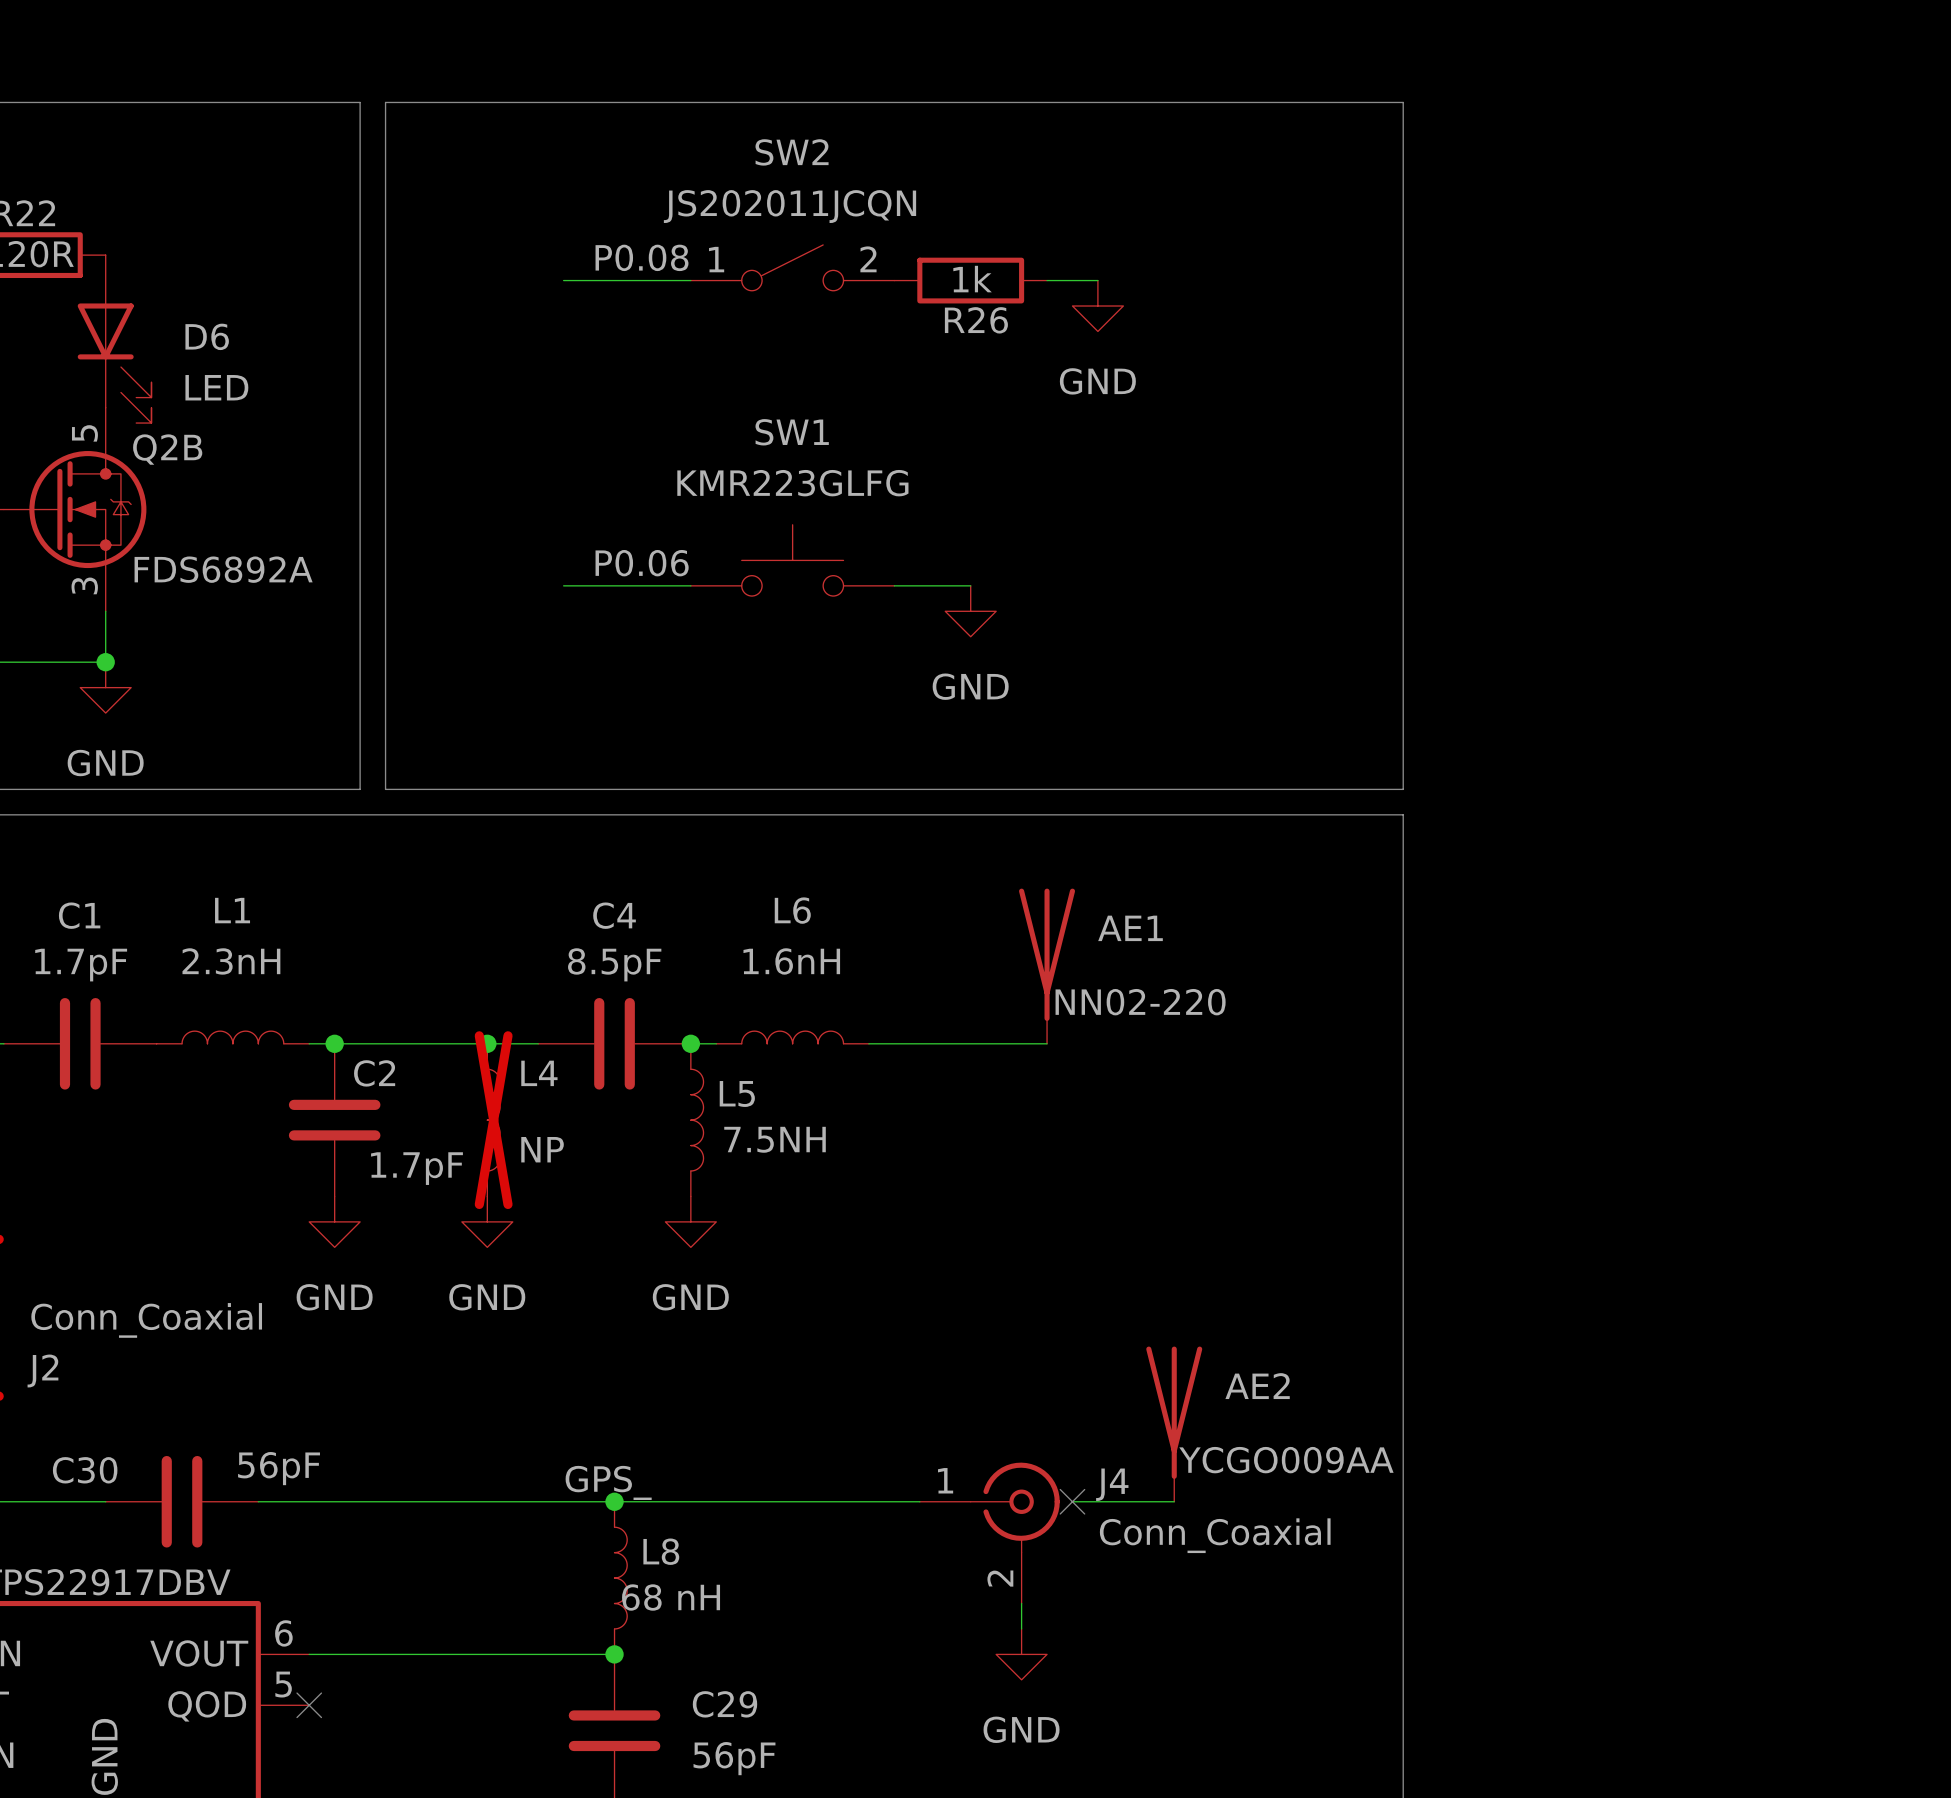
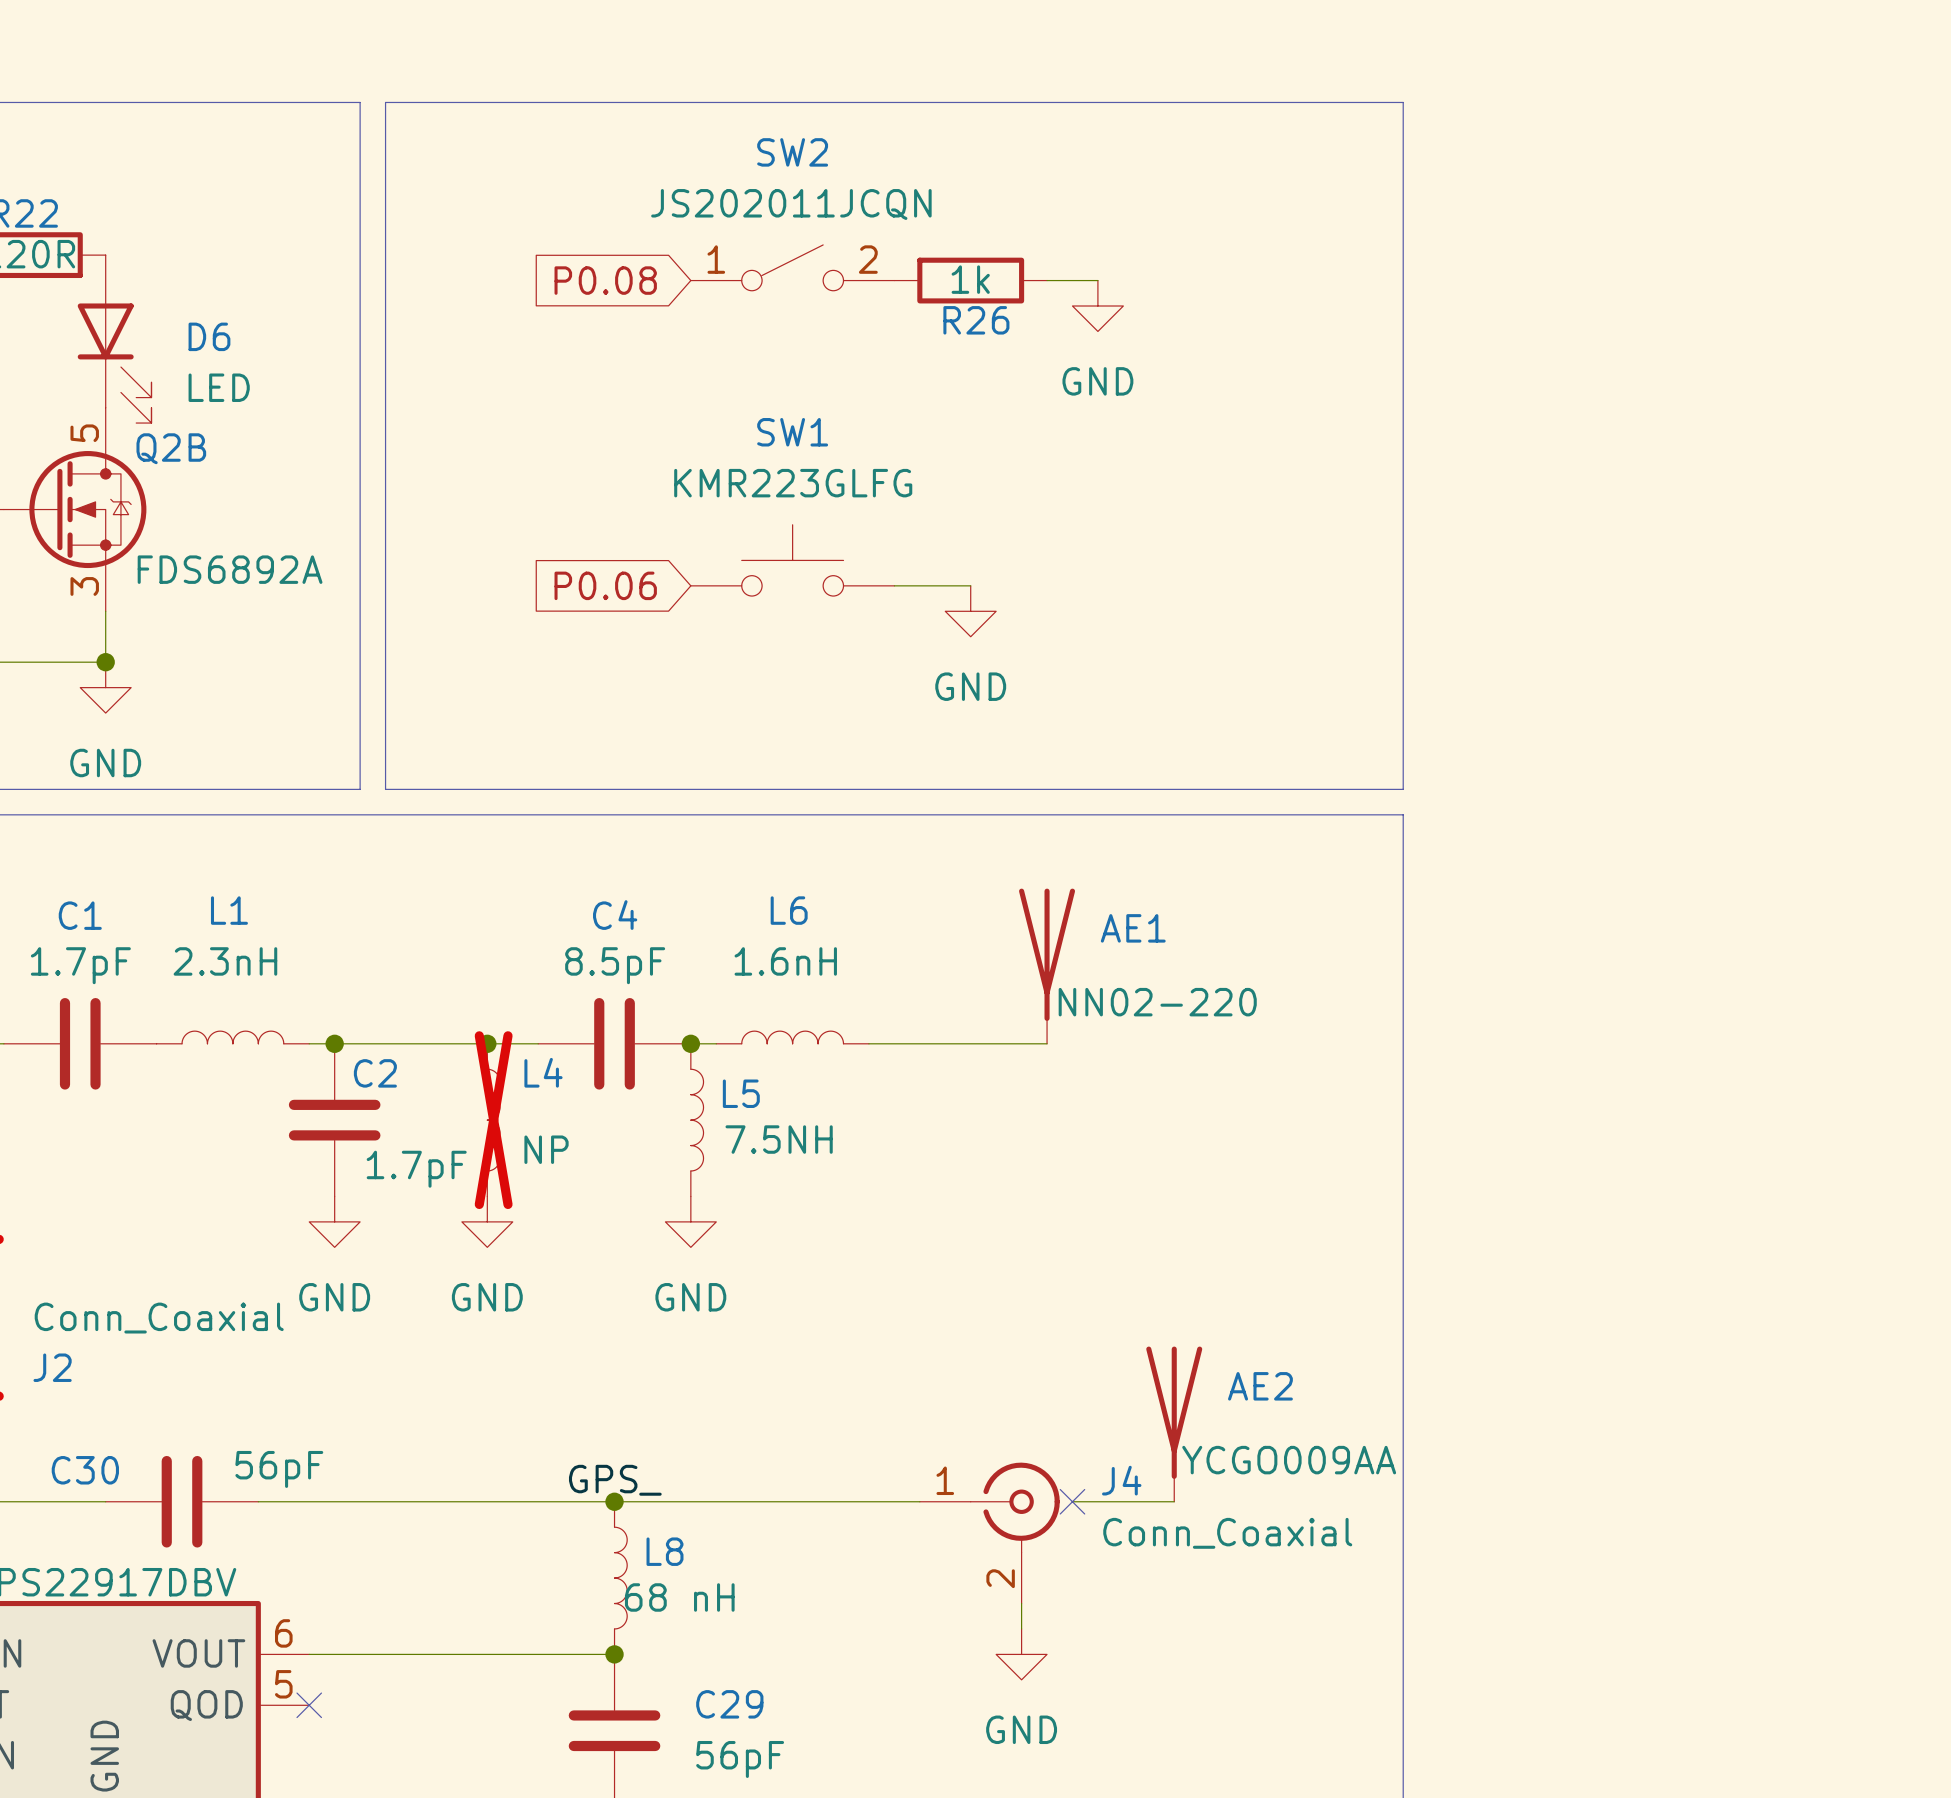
label: P0.08 (642, 257) -> none
wire: (563, 280) (690, 280) -> none
global label: none -> P0.08 (605, 280)
label: P0.06 (642, 563) -> none
wire: (563, 585) (690, 585) -> none
global label: none -> P0.06 (605, 585)

